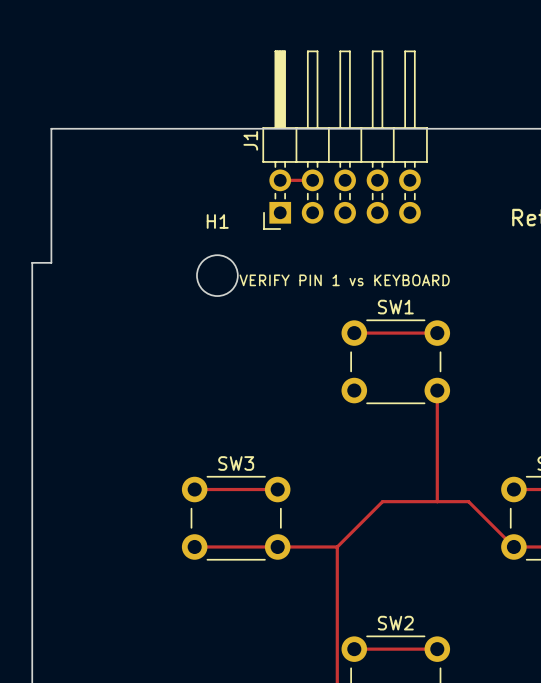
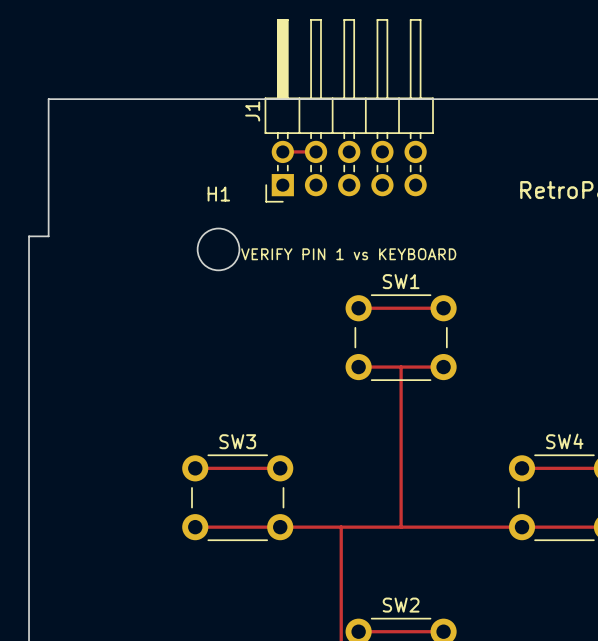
track: none -> (401, 367) (401, 527)
track: (437, 390) (437, 501) -> (443, 367) (358, 367)
track: (337, 546) (382, 501) (468, 501) (513, 546) -> (341, 527) (522, 527)

